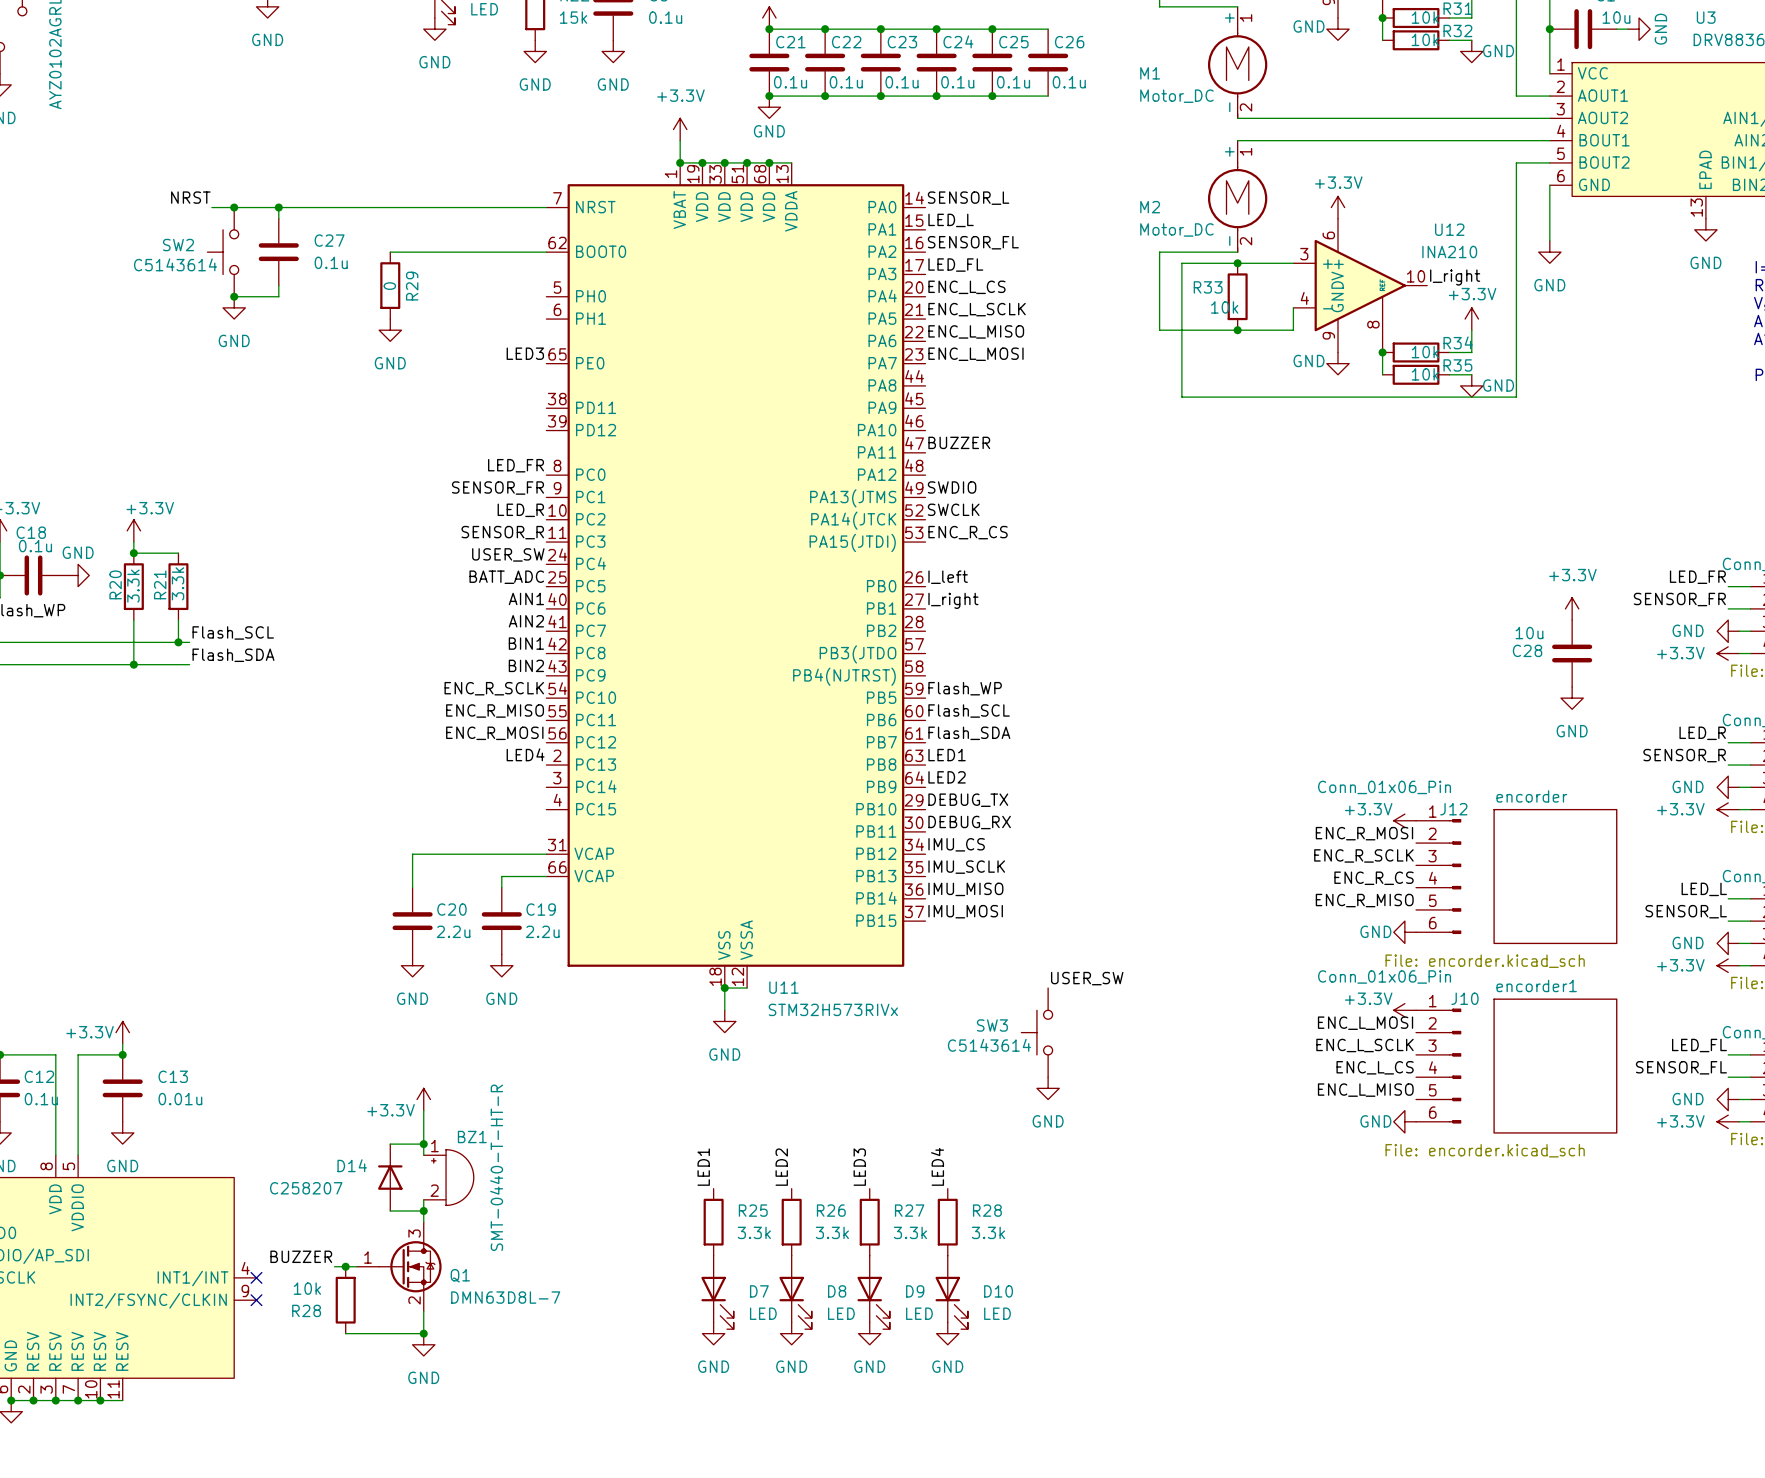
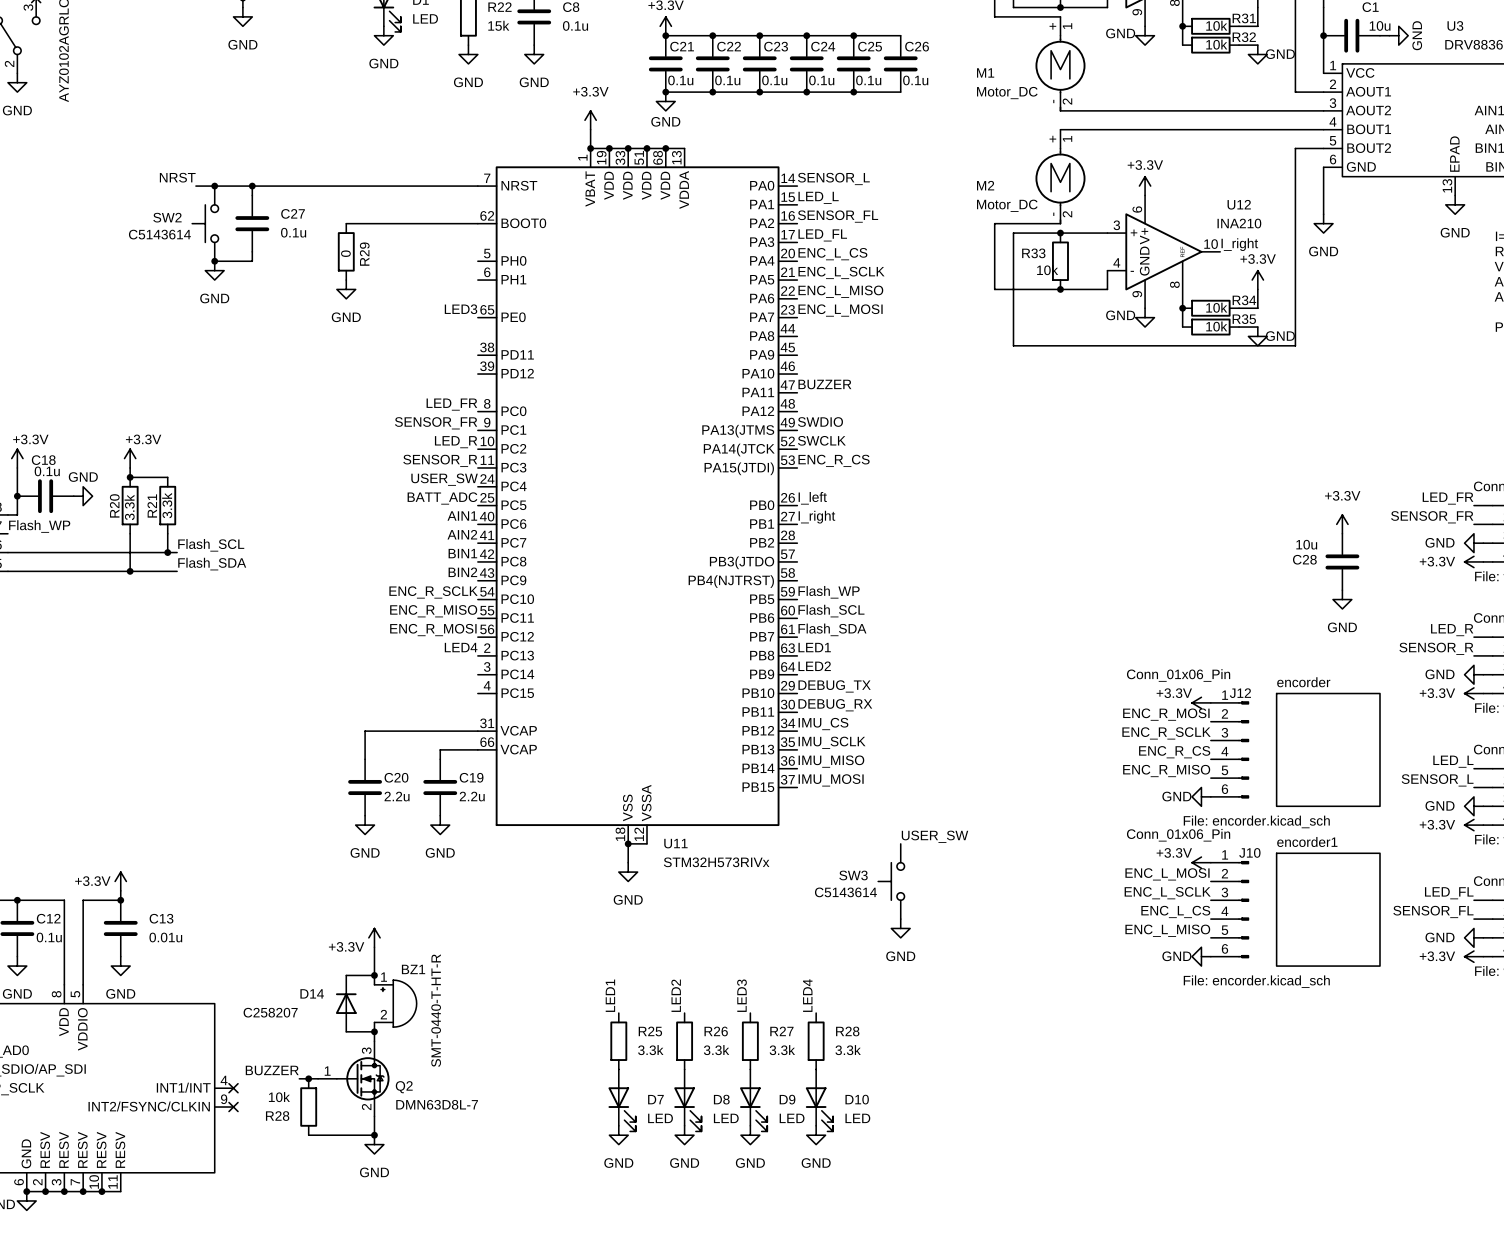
Q1 name: Q1 (460, 1275) -> Q2 (404, 1087)

